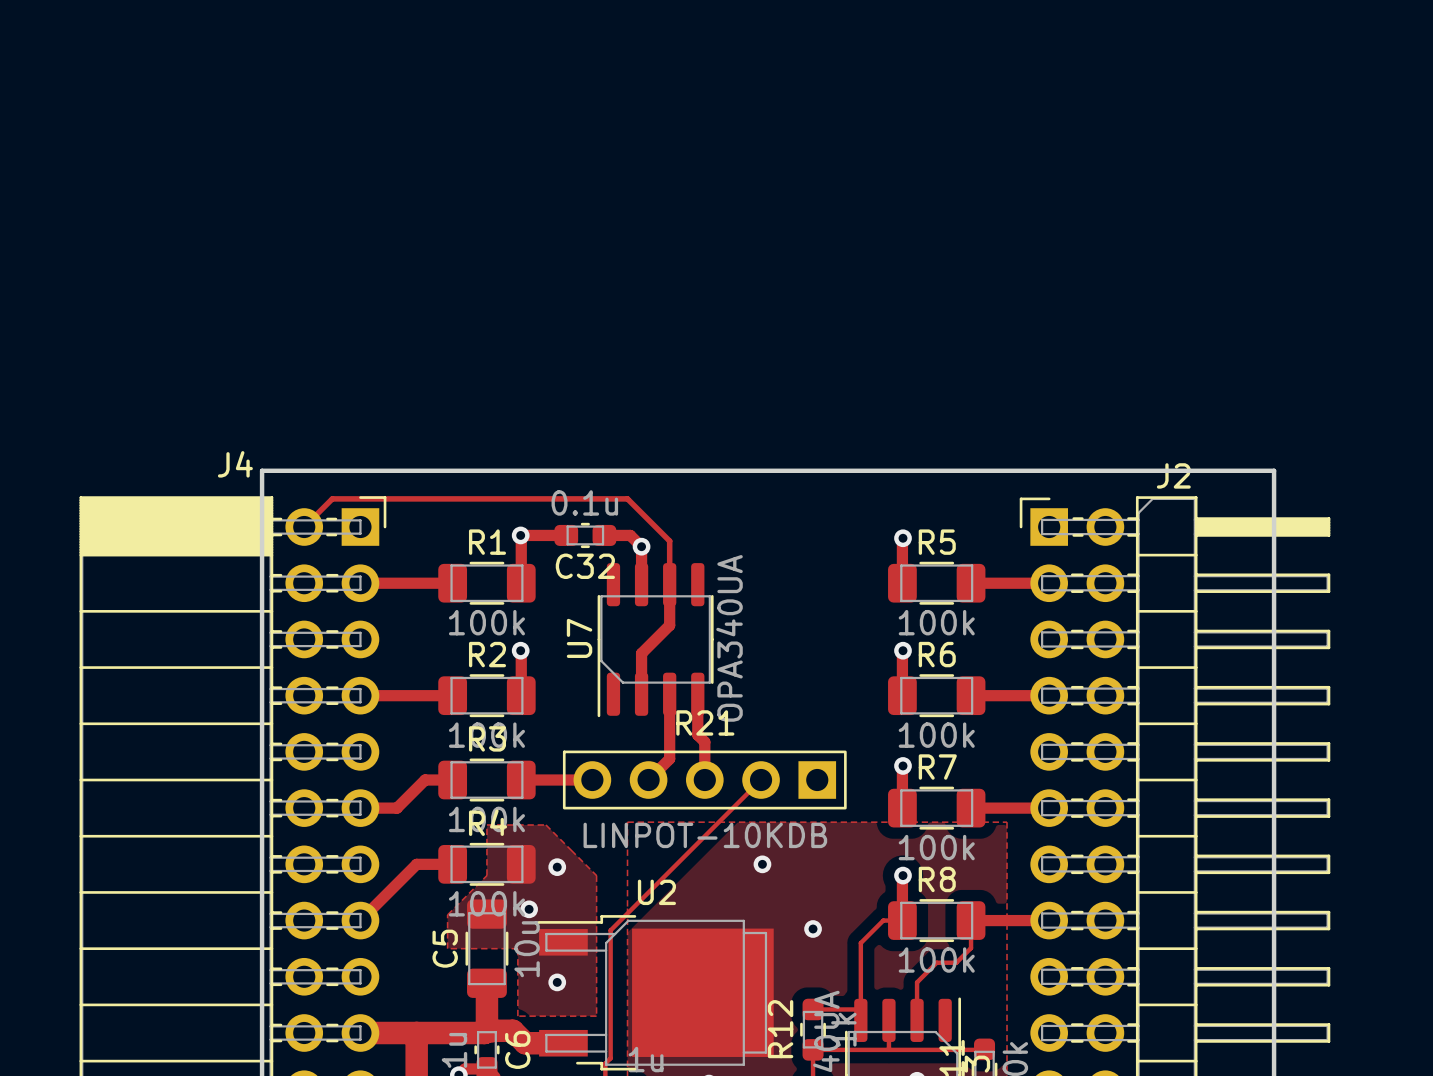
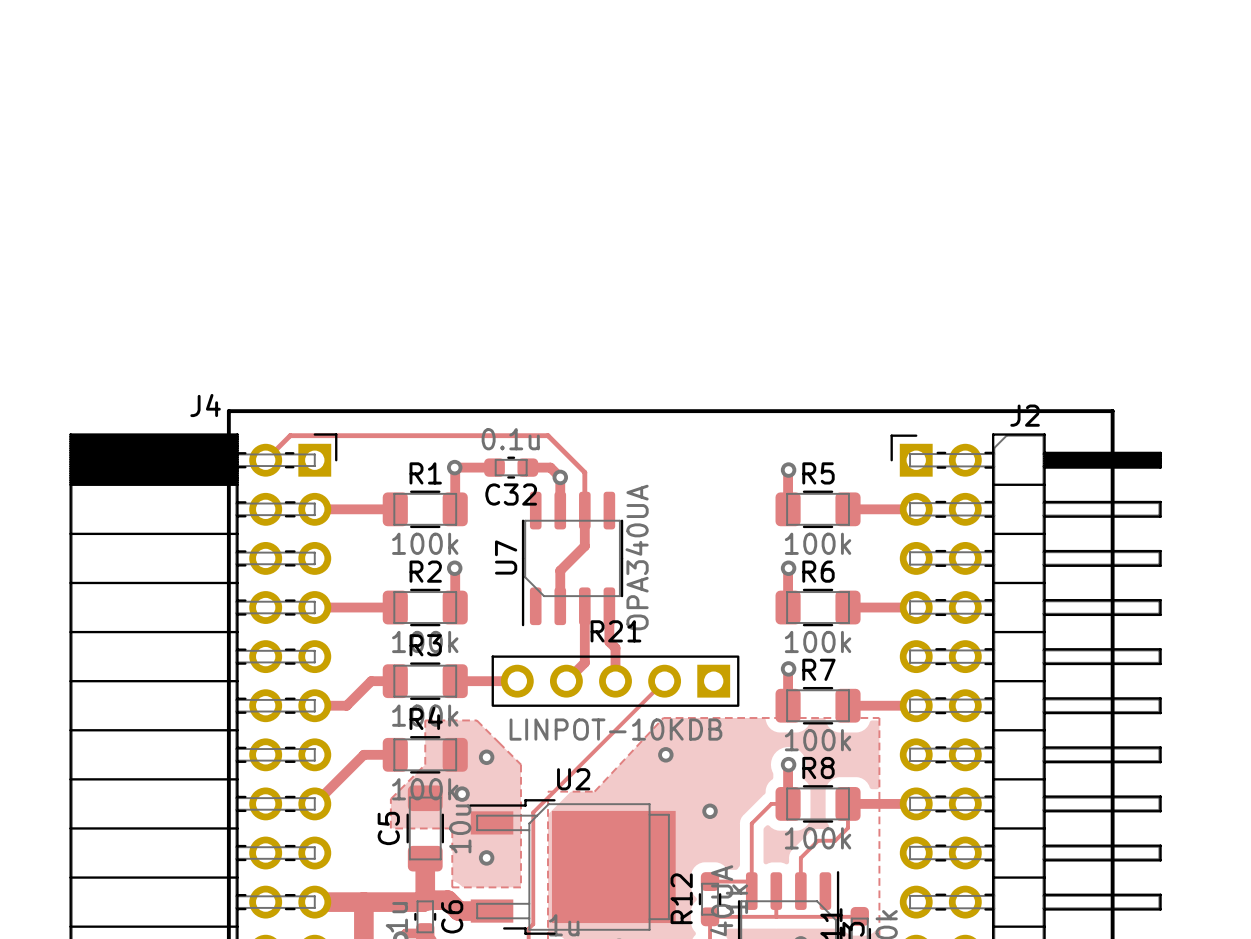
zone outline: (759, 822) (627, 822) (627, 906) -> (663, 717) (594, 791) (548, 791)

